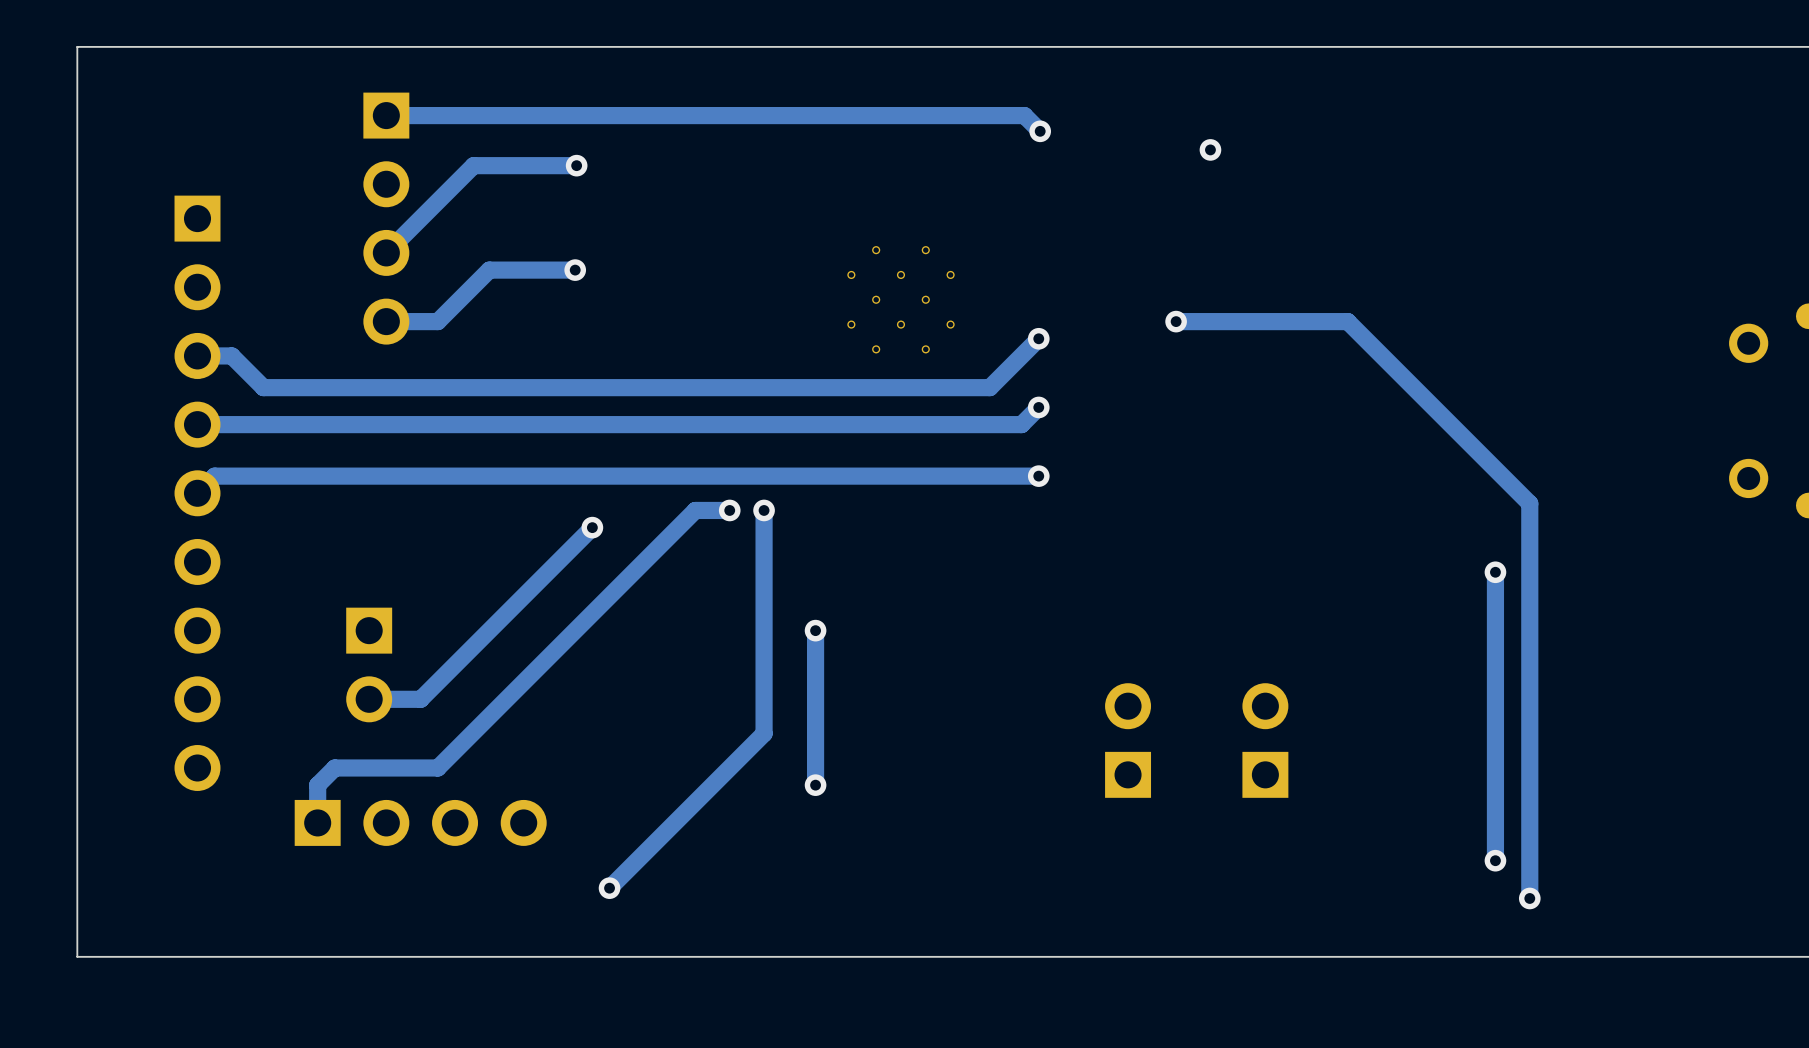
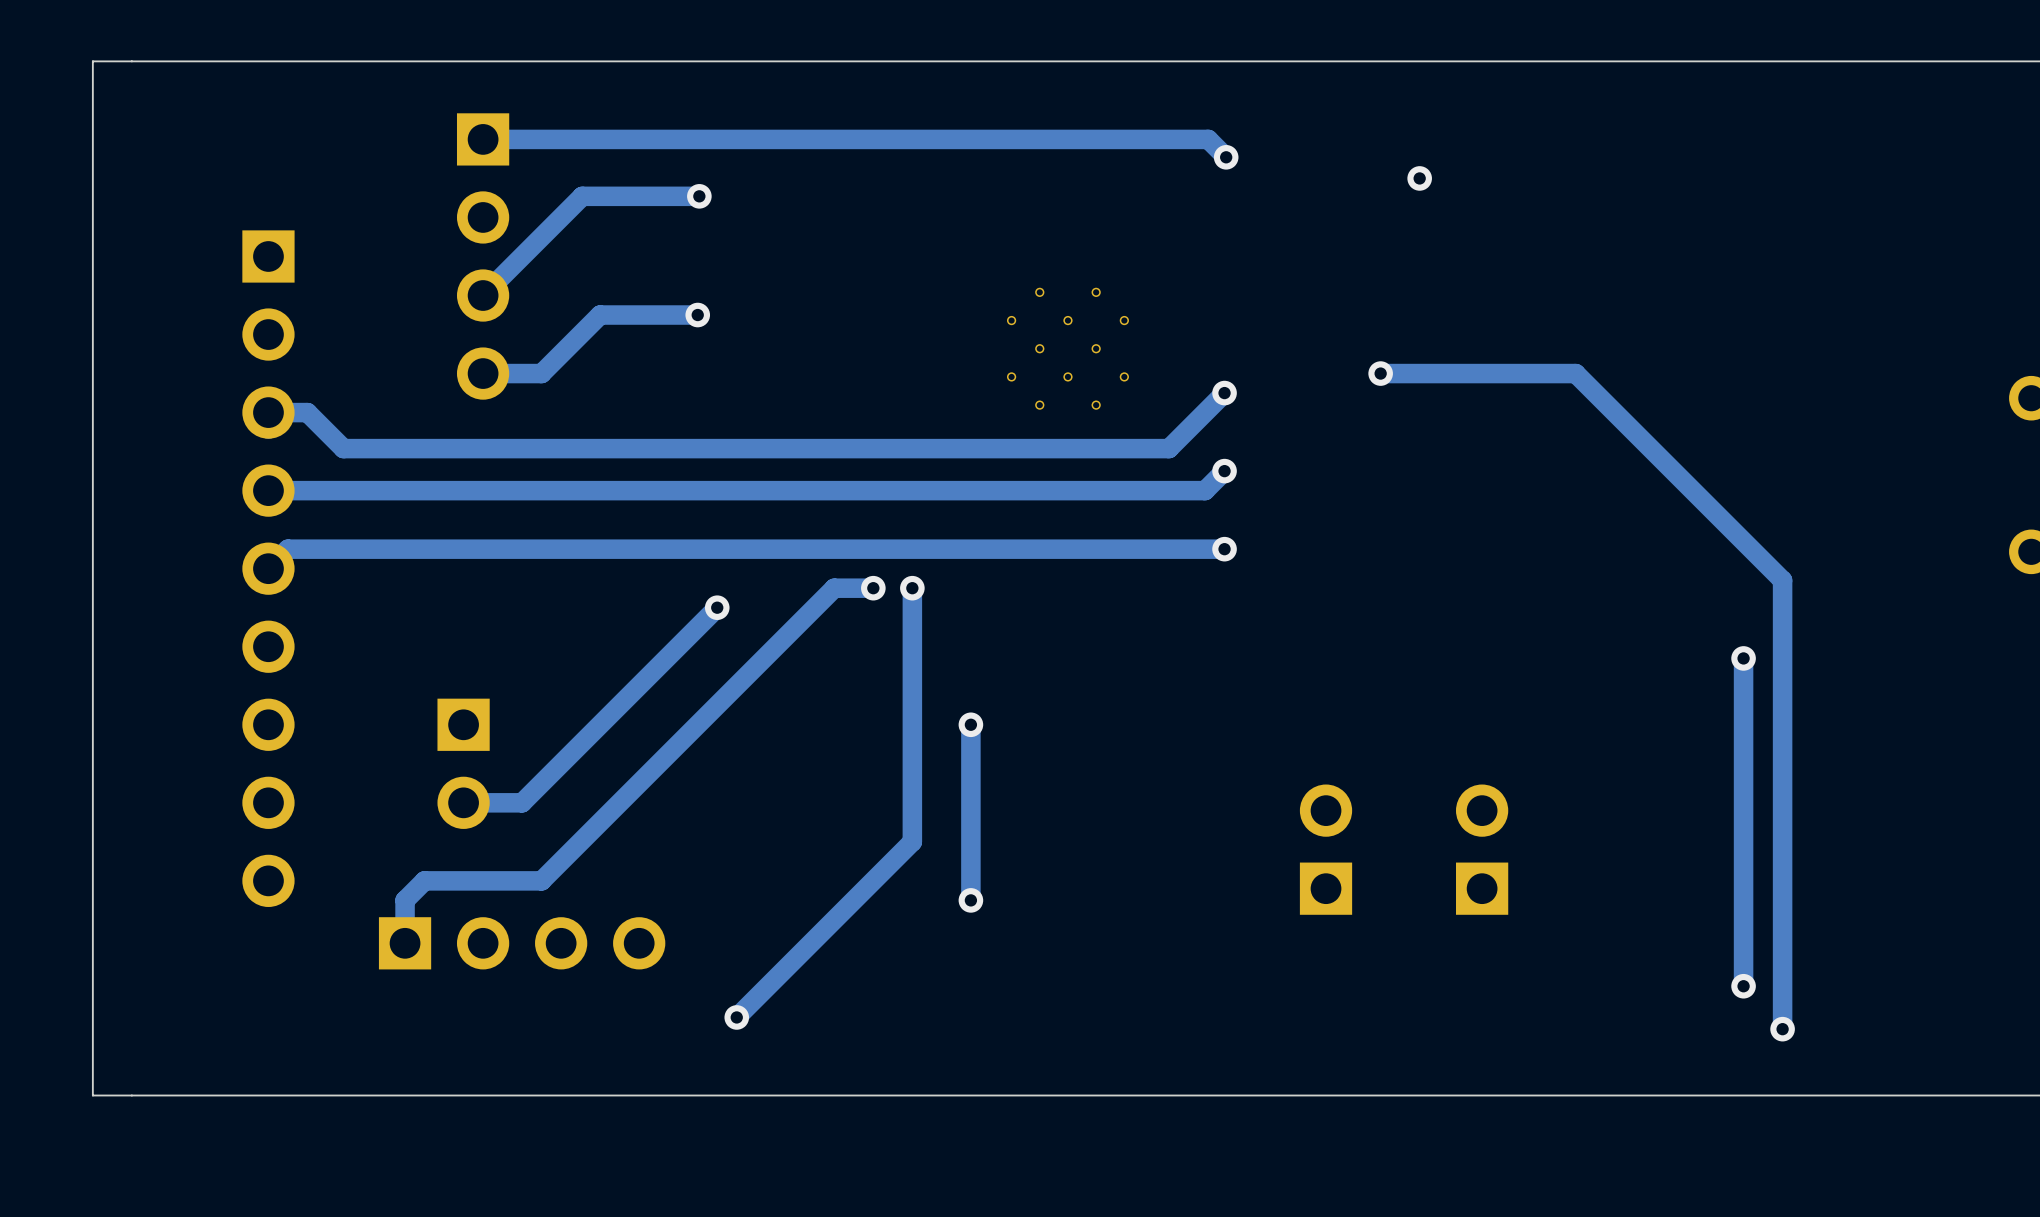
board edge: (77, 46) (77, 956) -> (131, 61) (92, 61) (92, 1095) (131, 1095)

